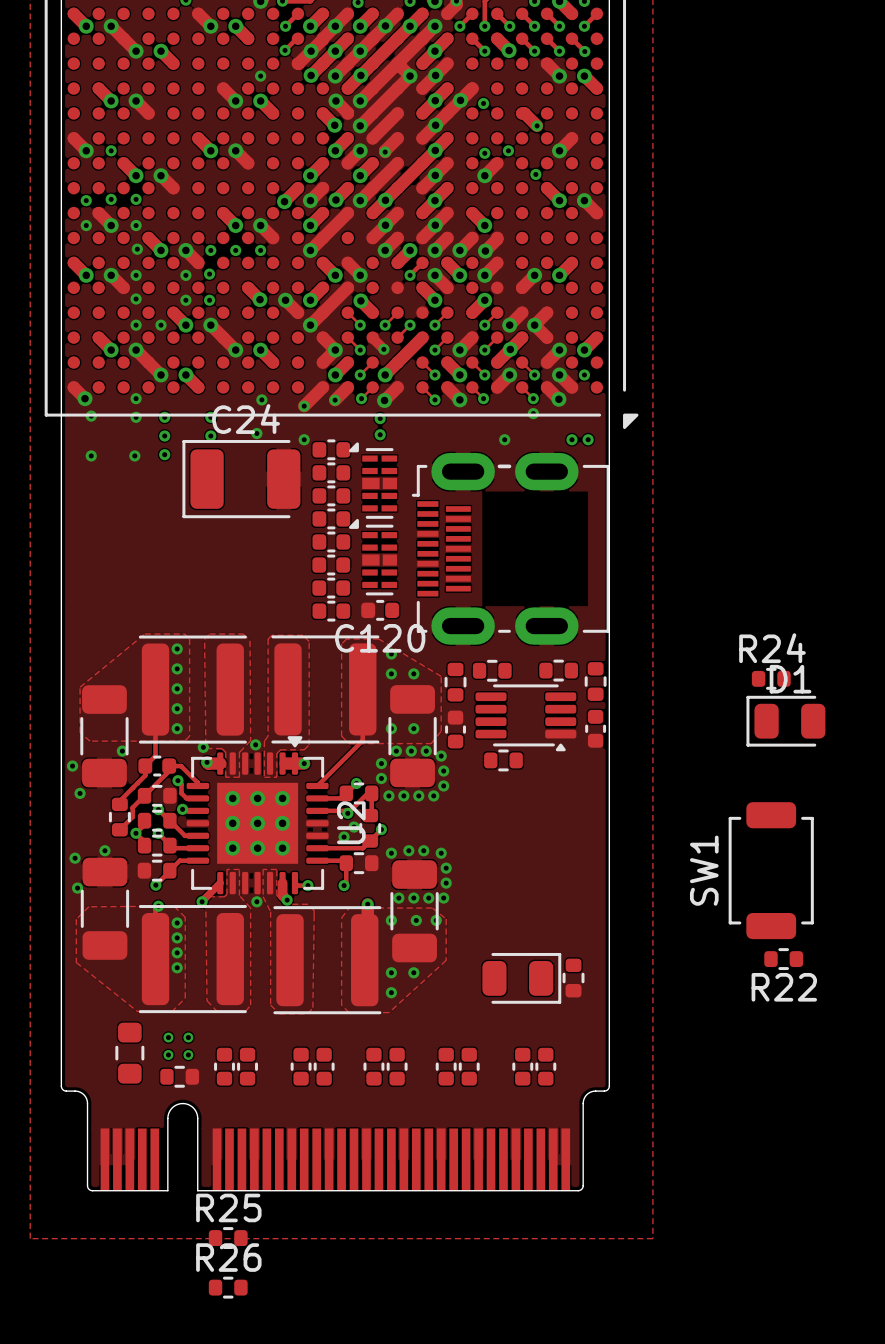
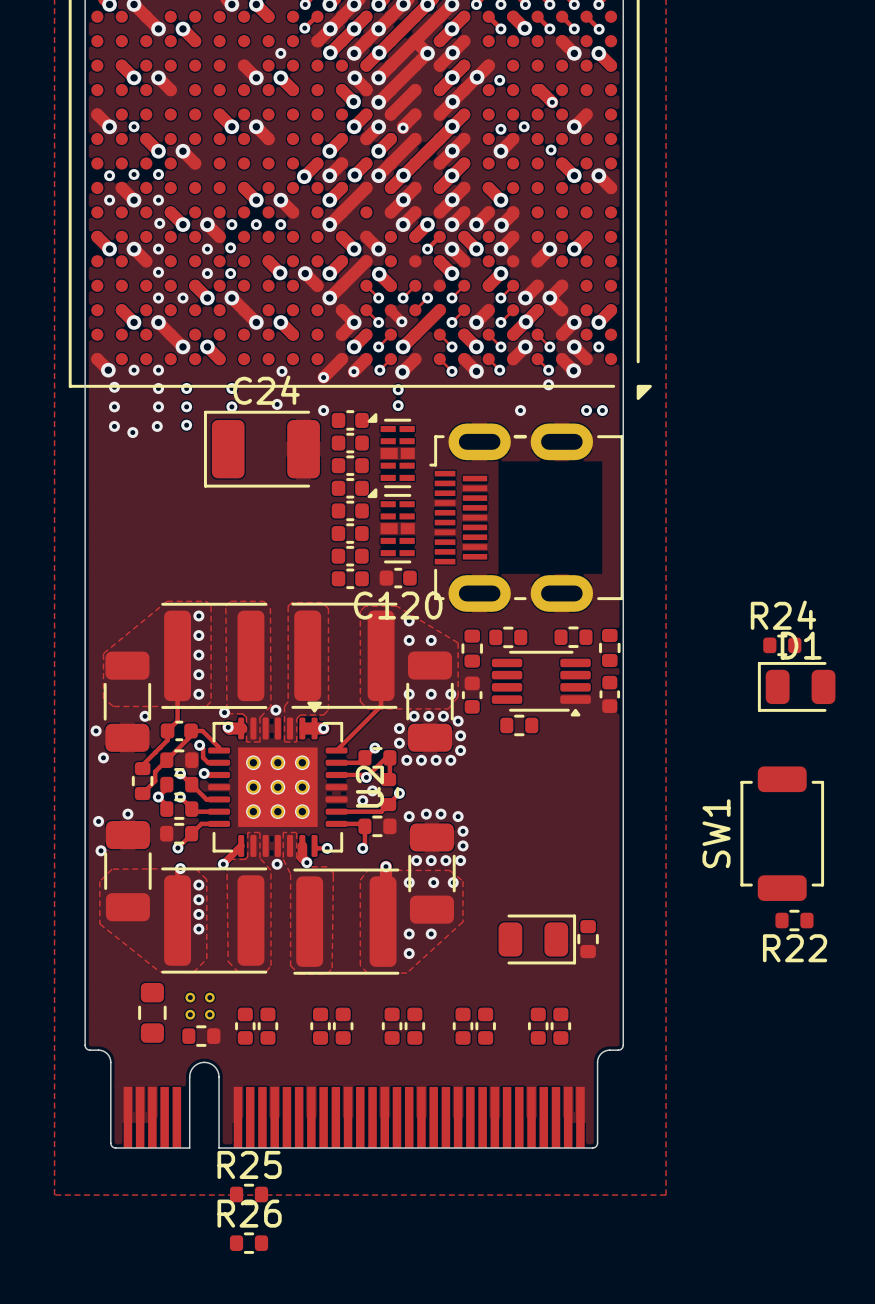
via: none -> (134, 370)
via: none -> (114, 406)
via: none -> (158, 406)
via: none -> (132, 432)
via: none -> (450, 694)

